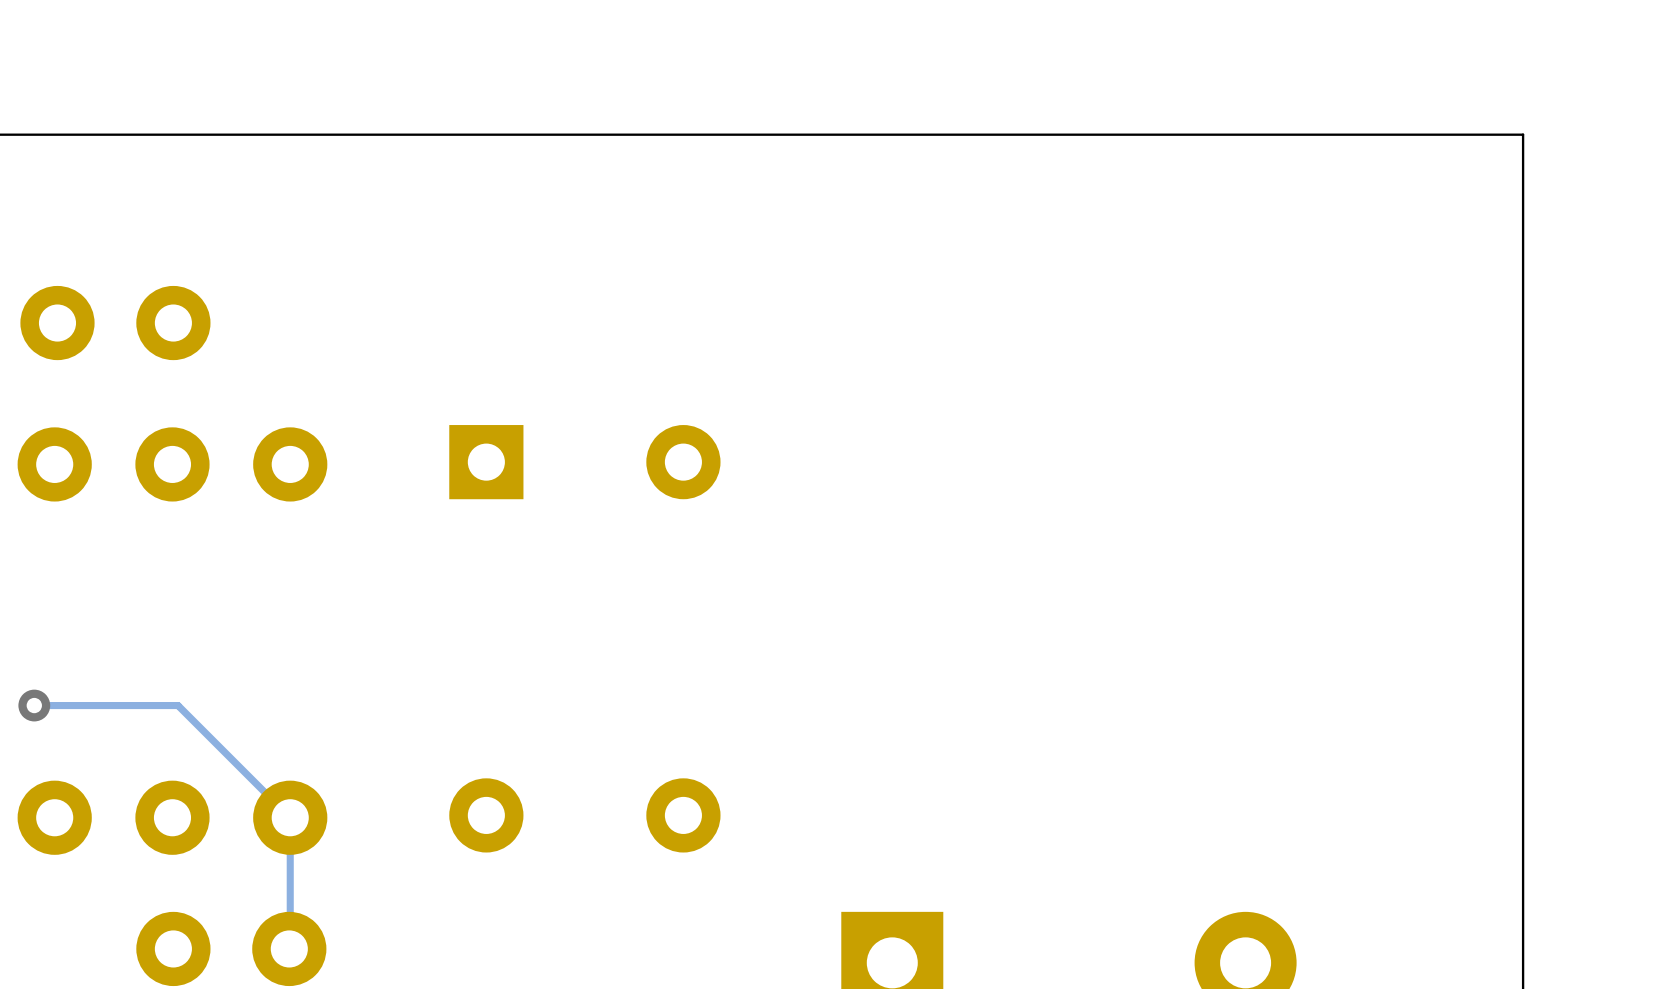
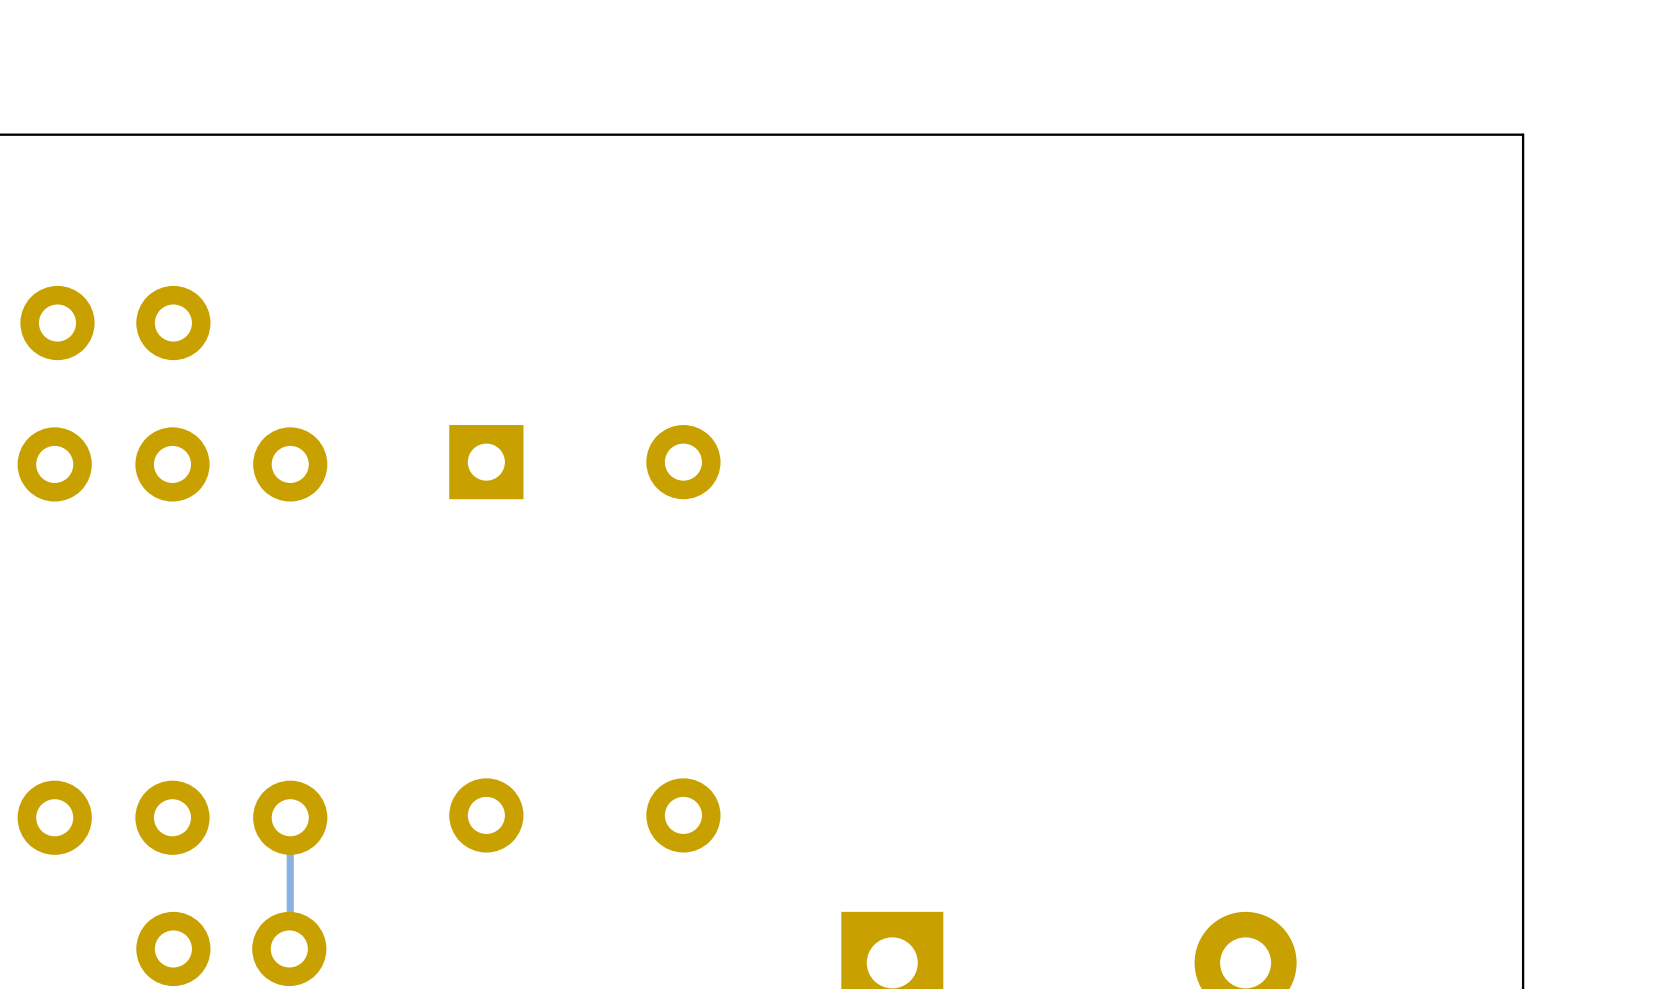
track: (34, 705) (178, 705) (290, 817) -> none
via: (34, 705) -> none

